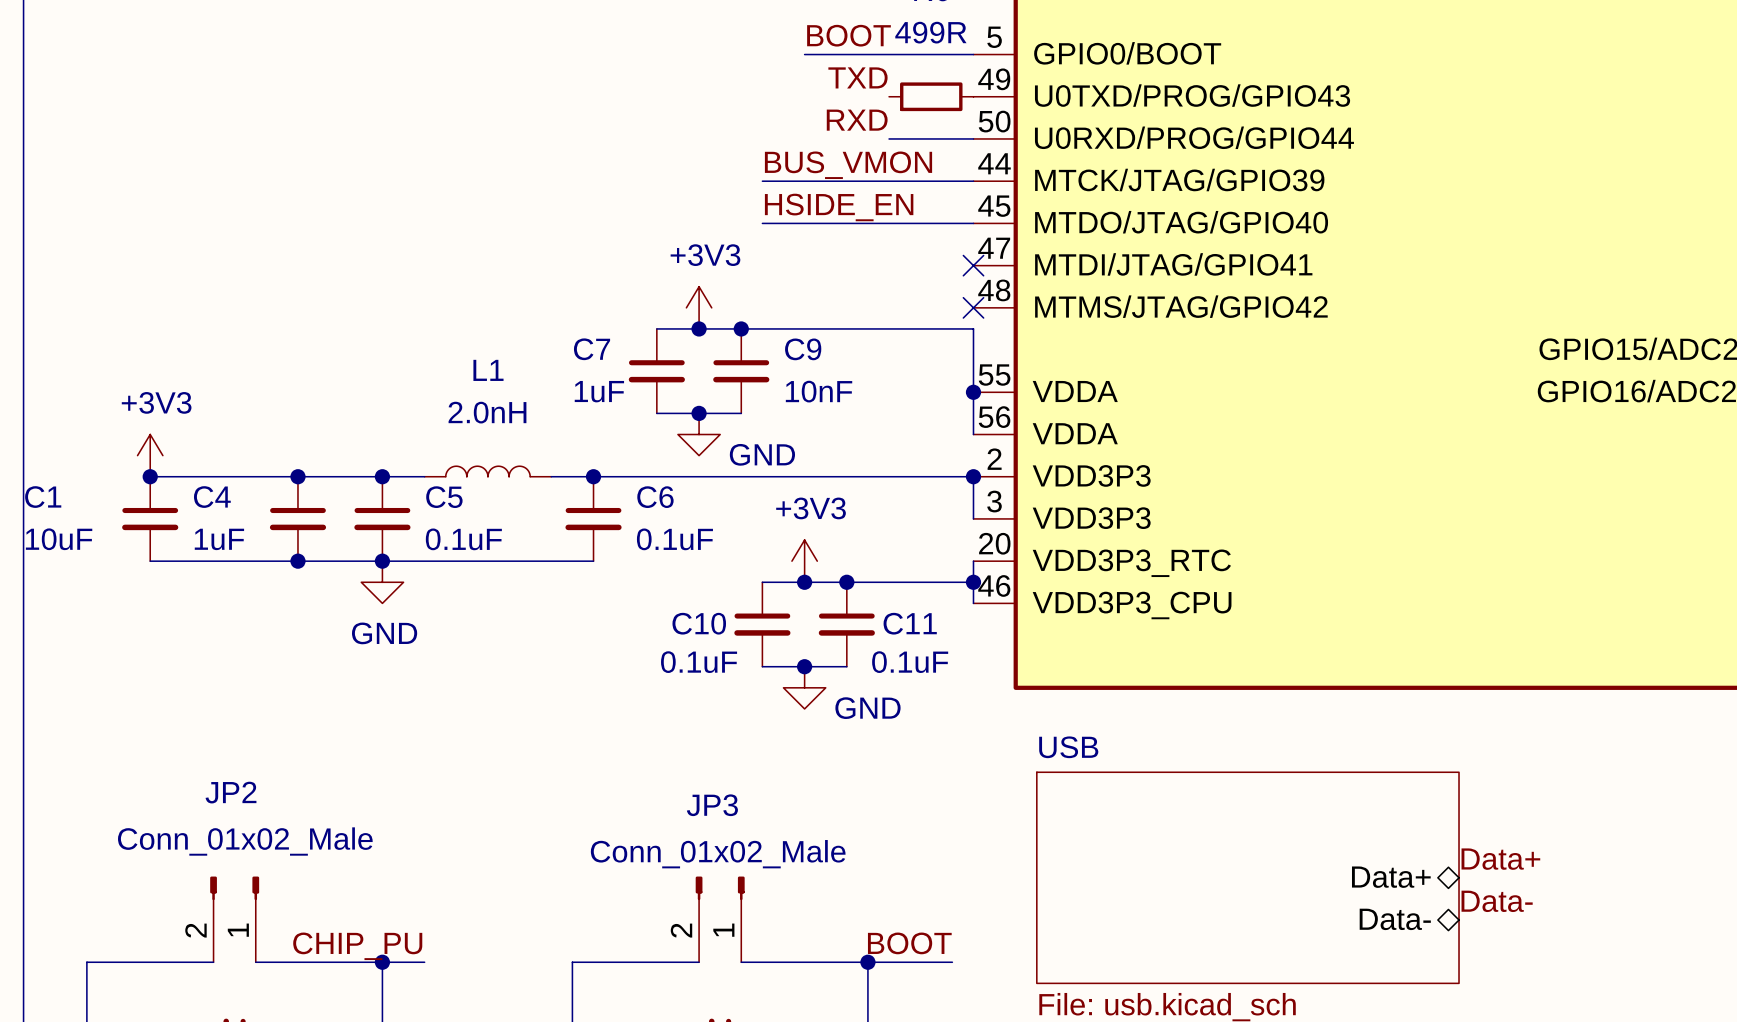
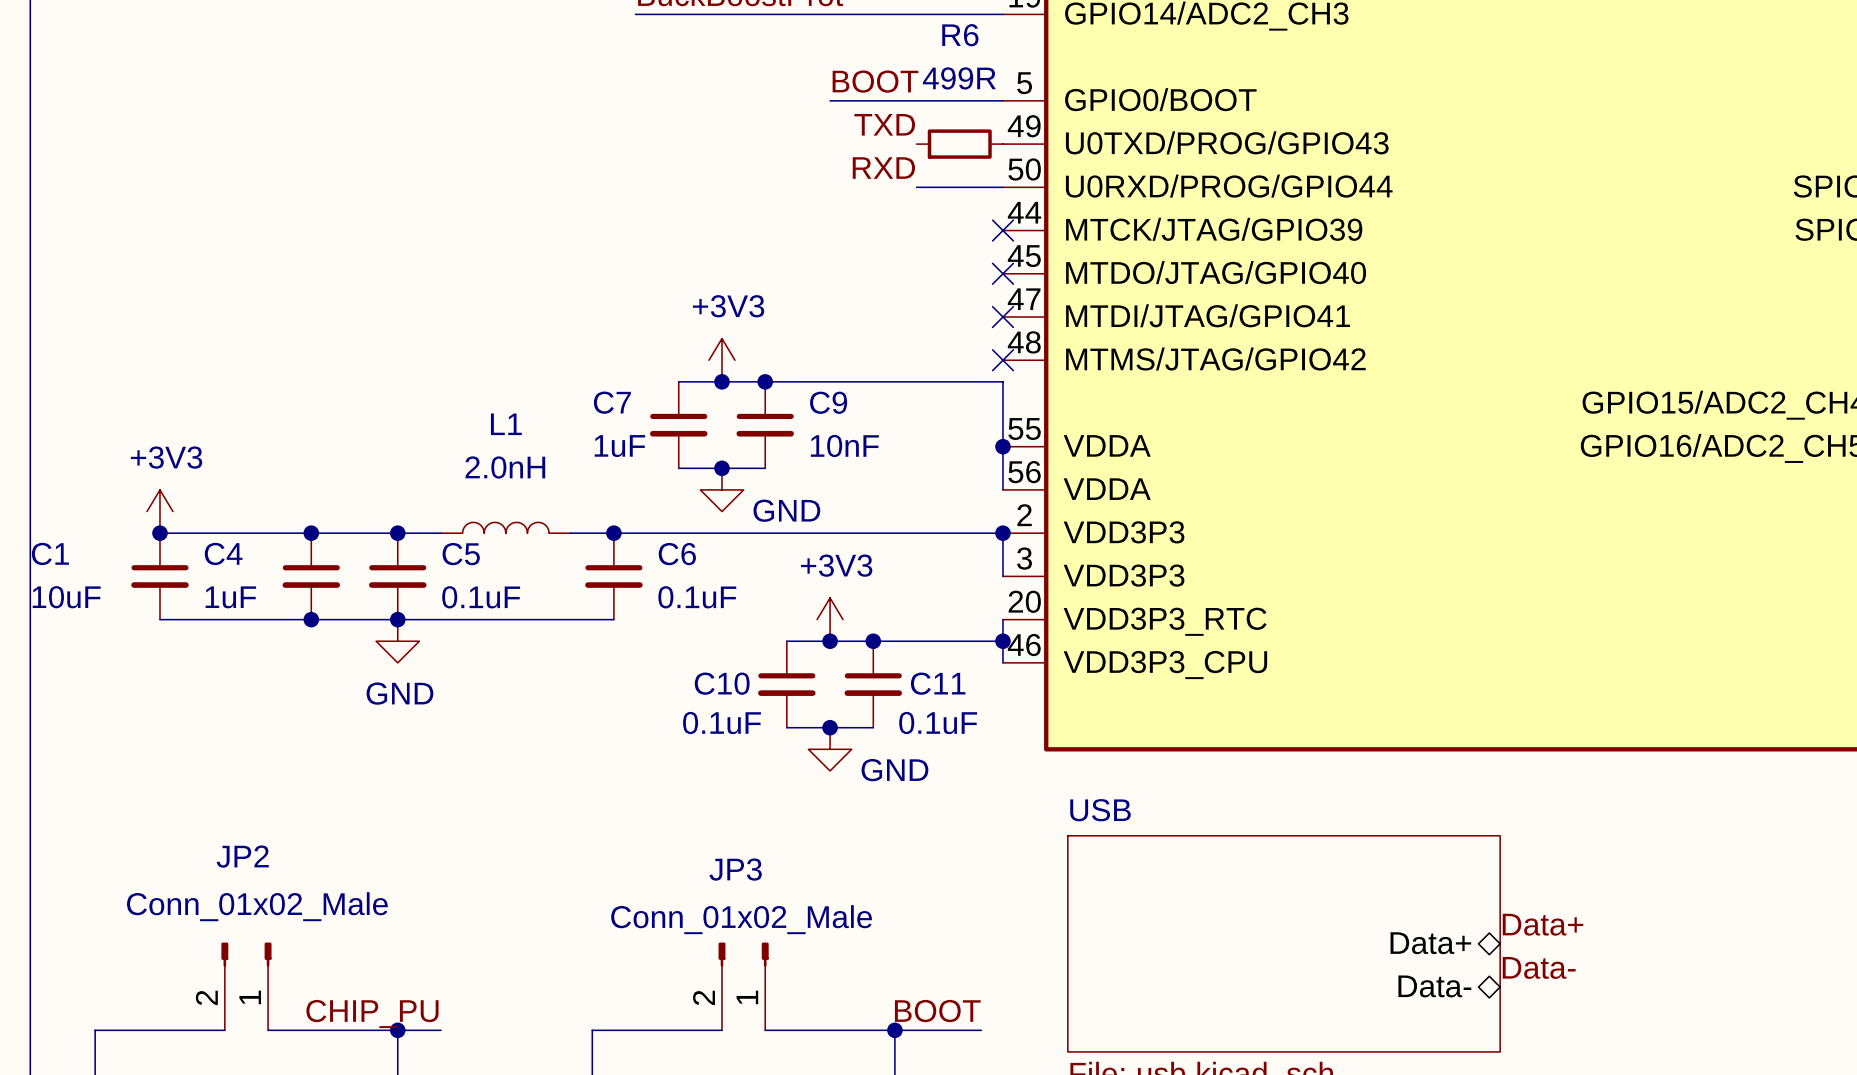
label: BUS_VMON (848, 165) -> none
wire: (762, 181) (973, 181) -> none
no-connect mark: none -> (1002, 230)
label: HSIDE_EN (839, 207) -> none
wire: (762, 223) (973, 223) -> none
no-connect mark: none -> (1002, 273)

